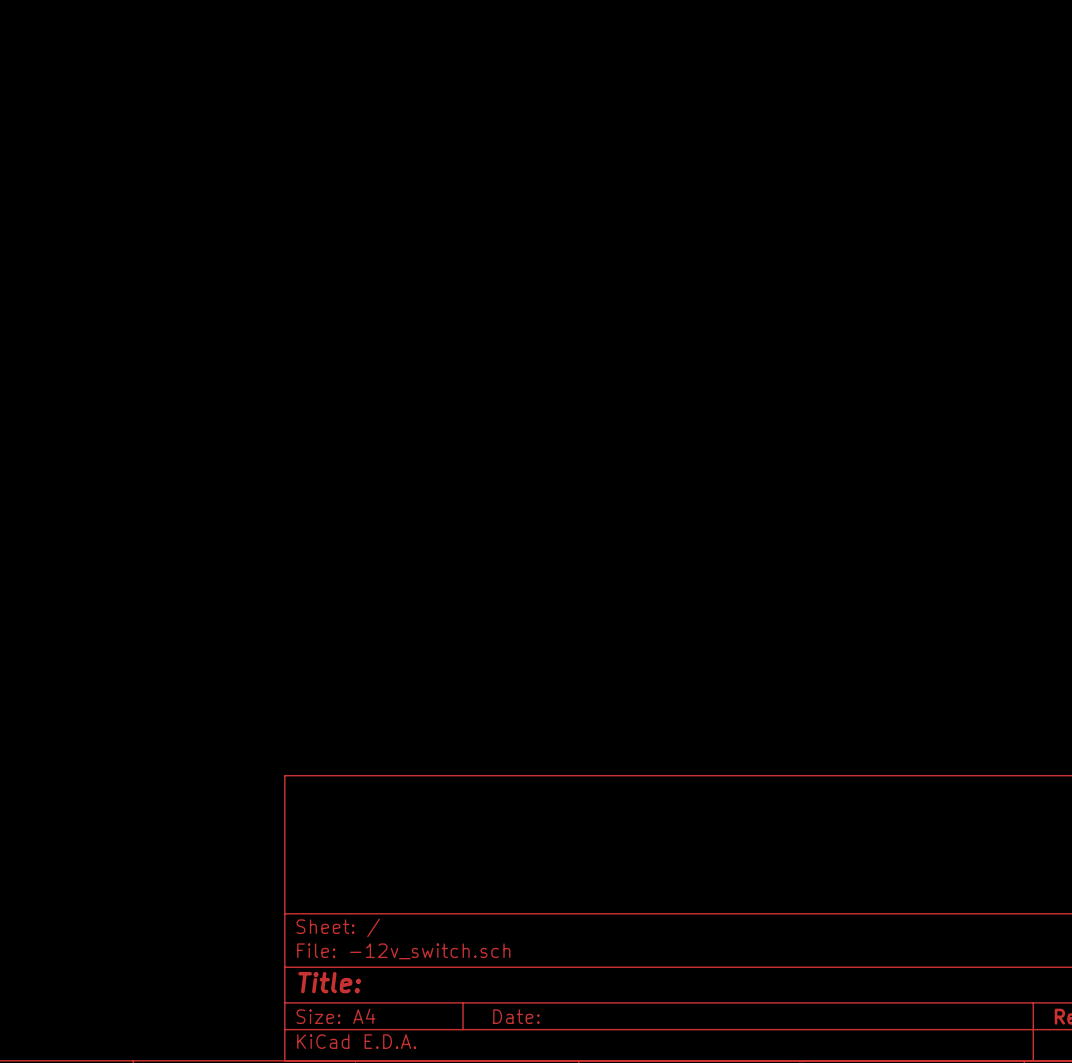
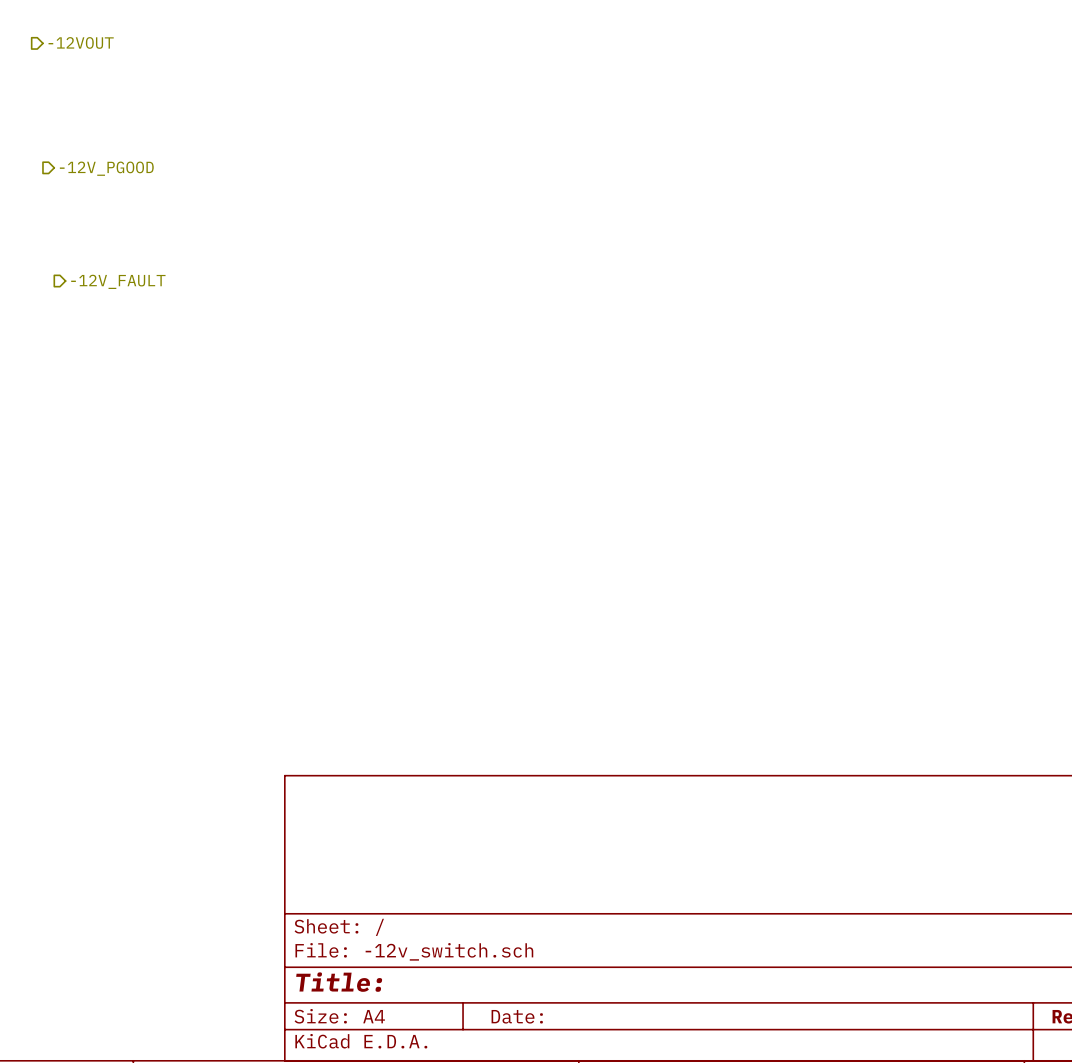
hierarchical label: none -> -12VOUT (81, 42)
hierarchical label: none -> -12V_PGOOD (106, 168)
hierarchical label: none -> -12V_FAULT (118, 281)

